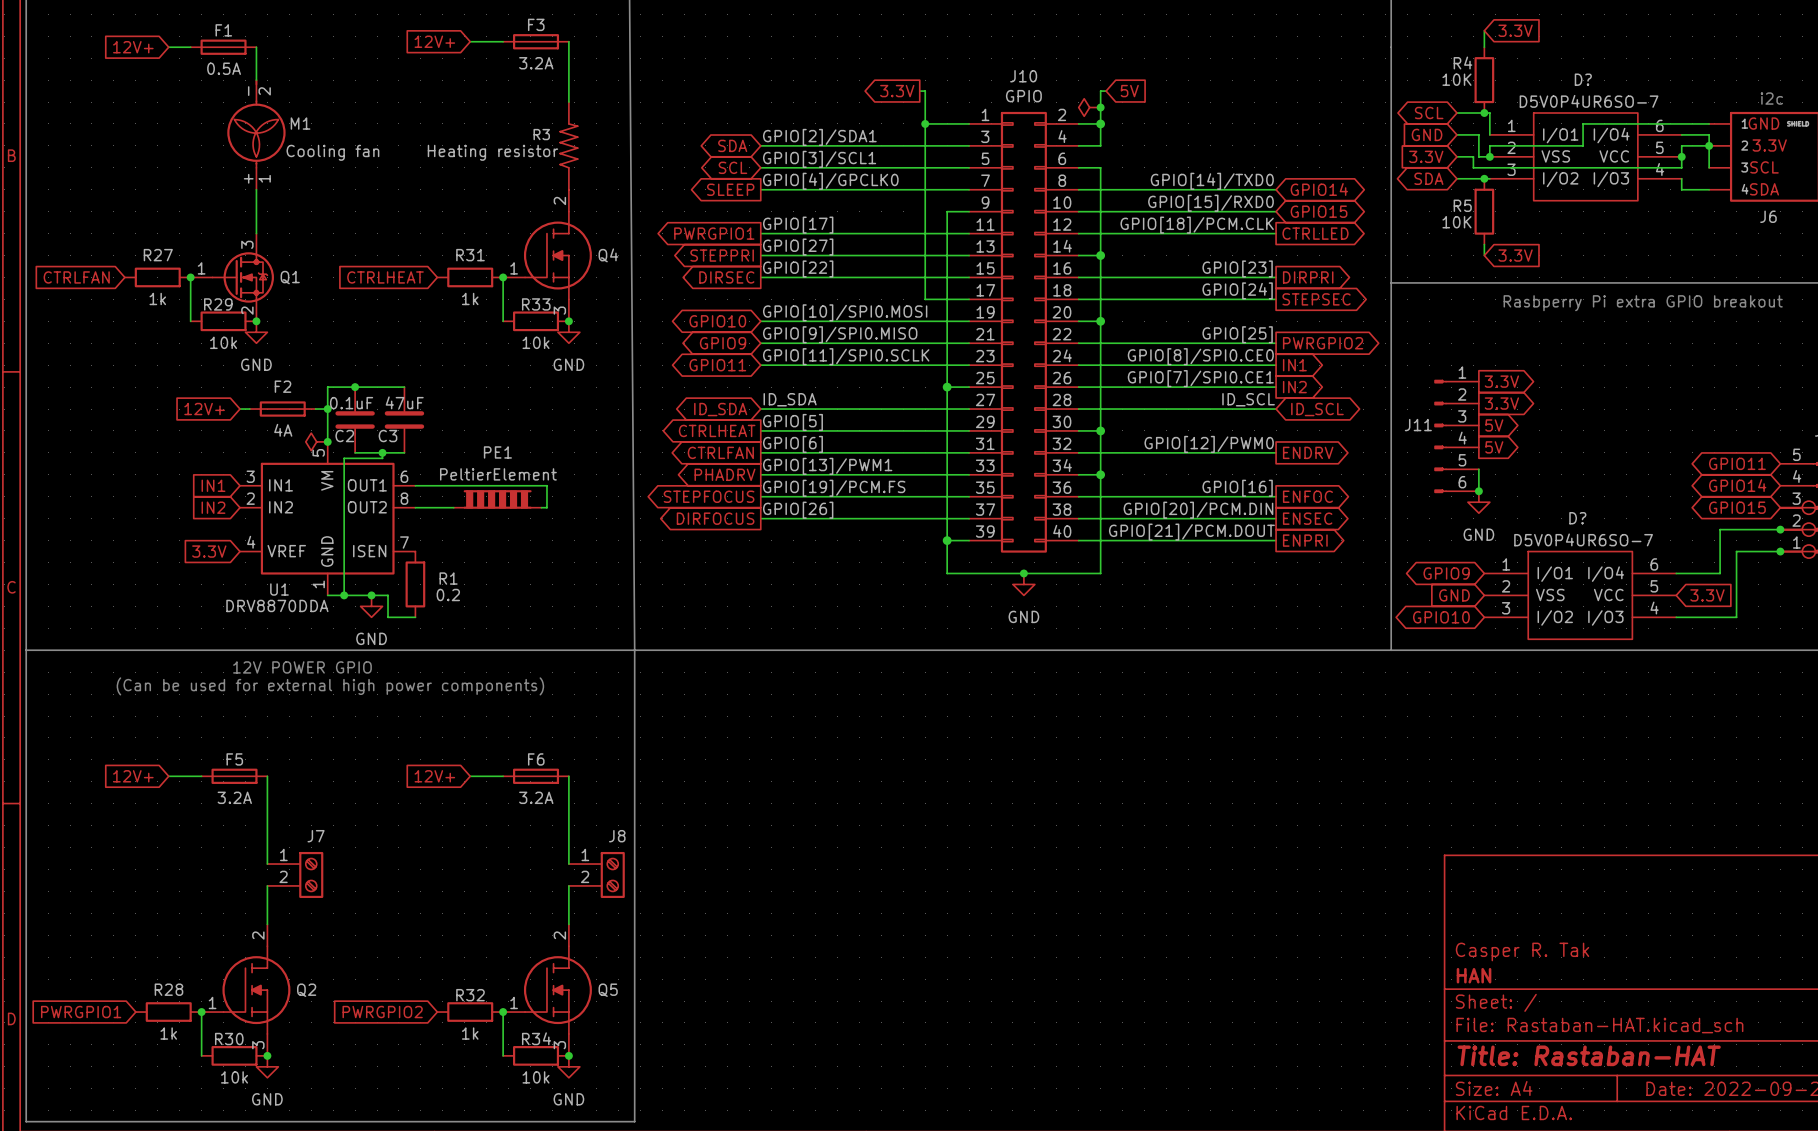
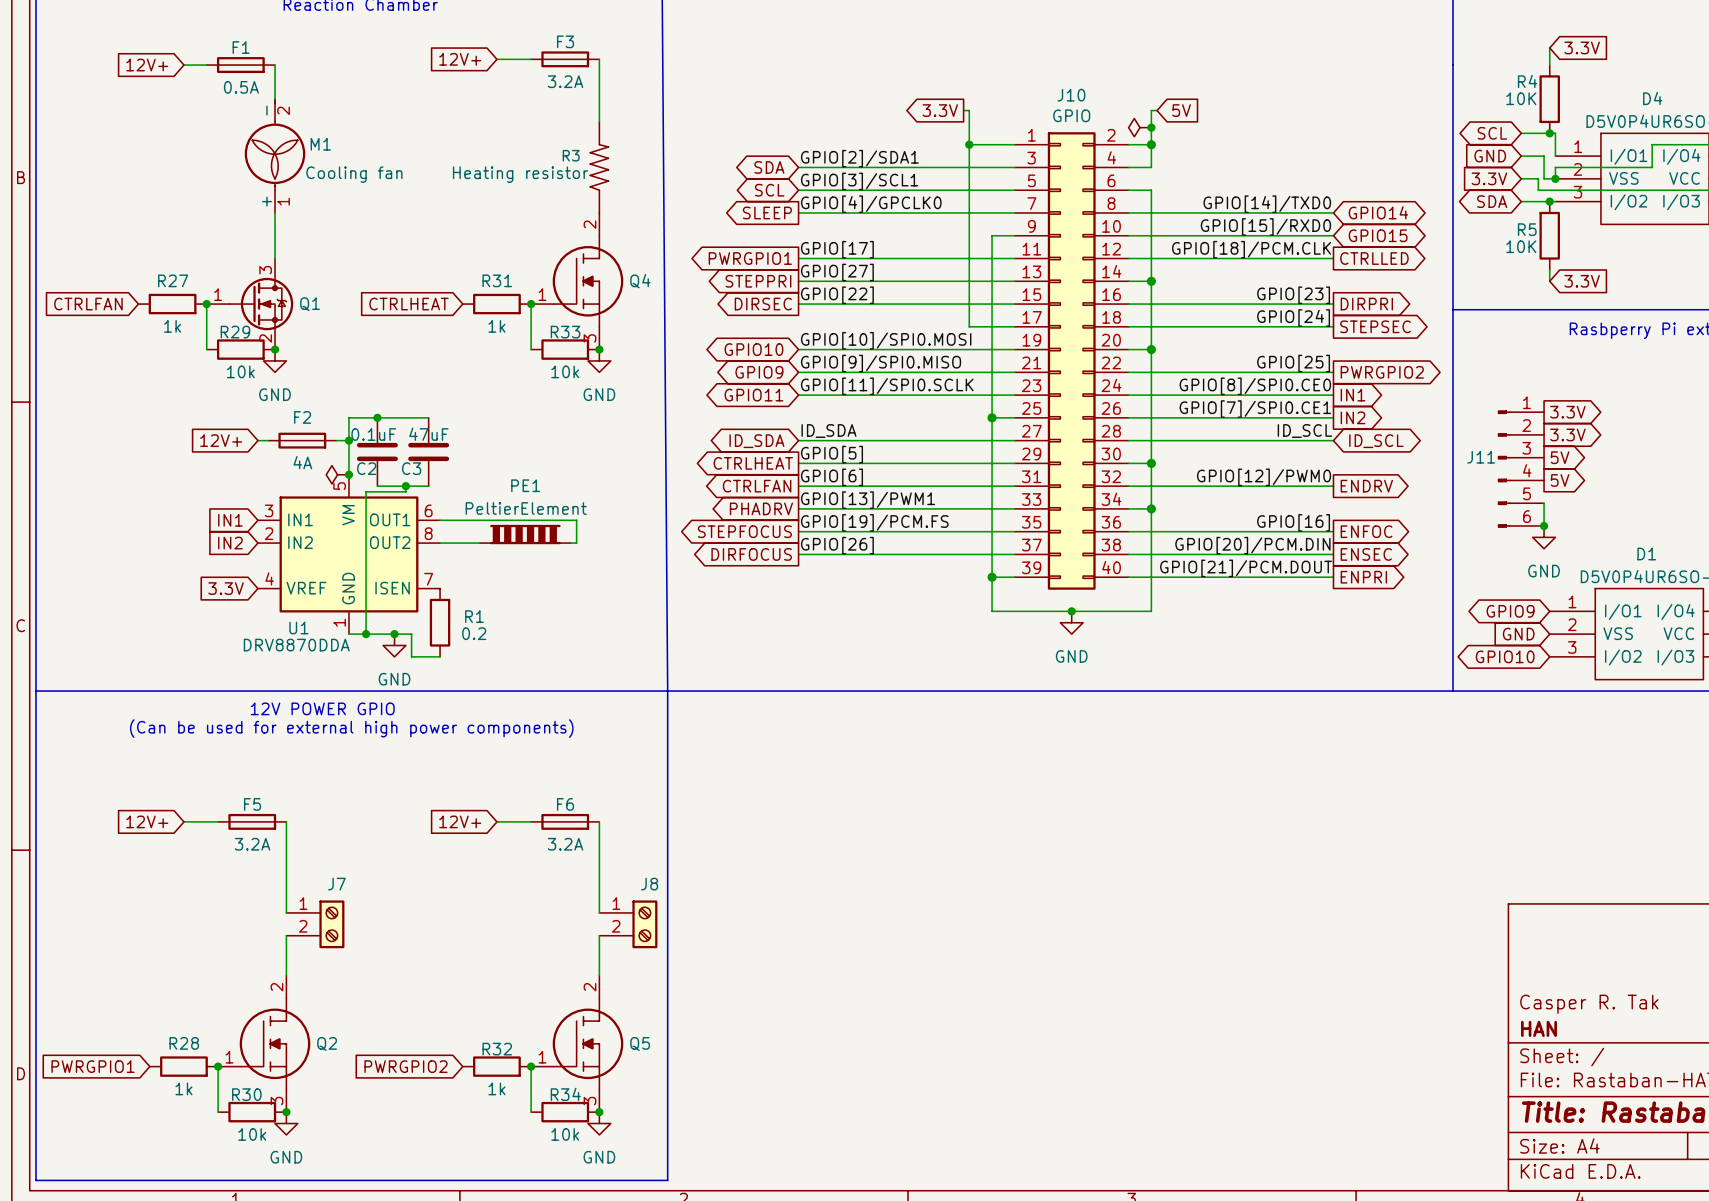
D? name: D? (1583, 79) -> D4 (1652, 98)
D? name: D? (1577, 518) -> D1 (1646, 554)

